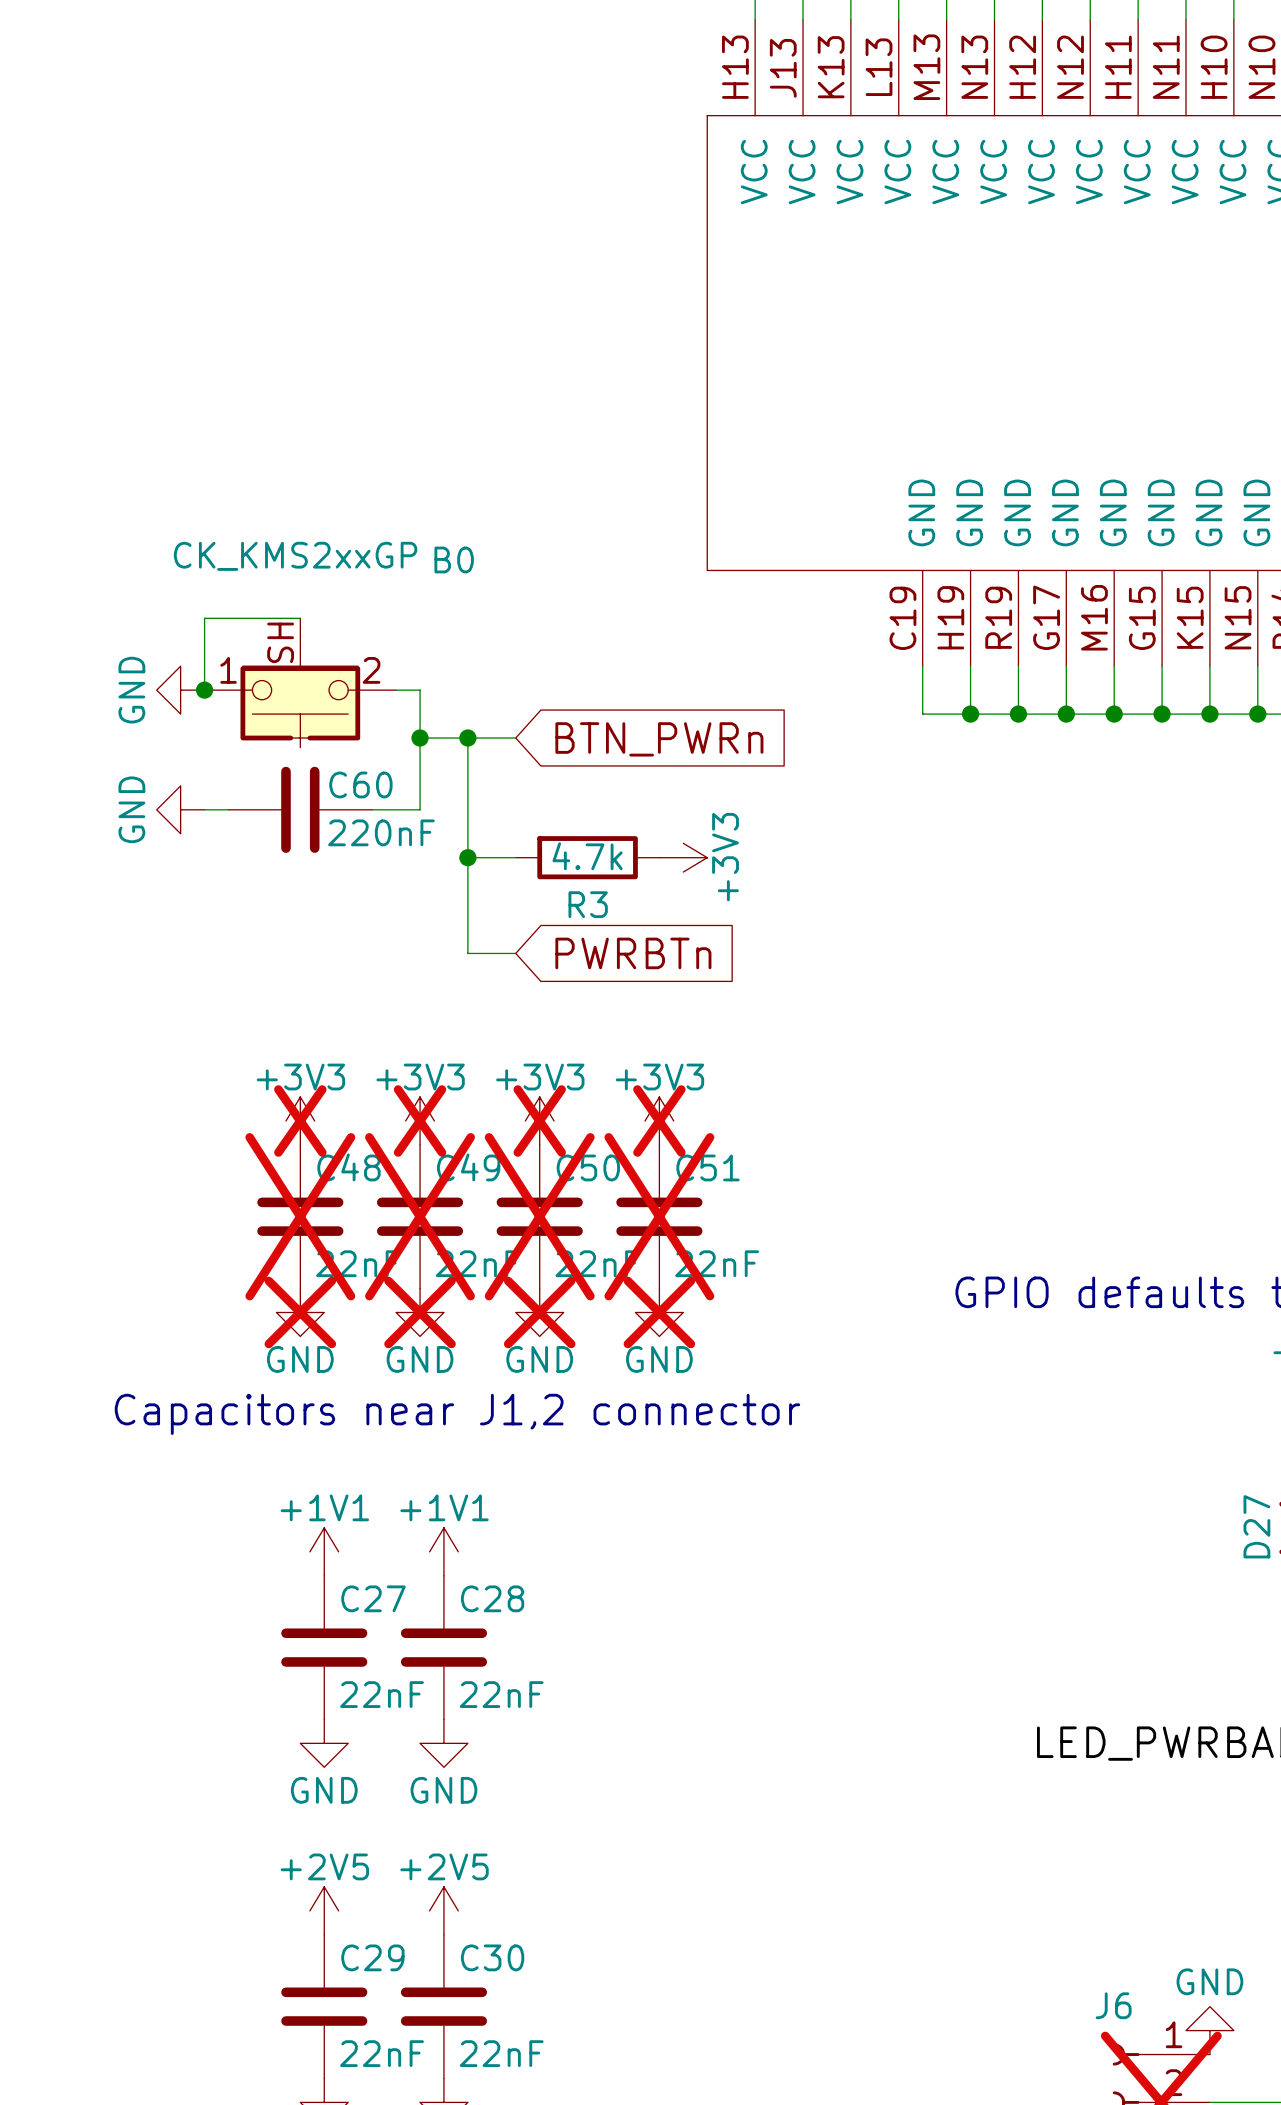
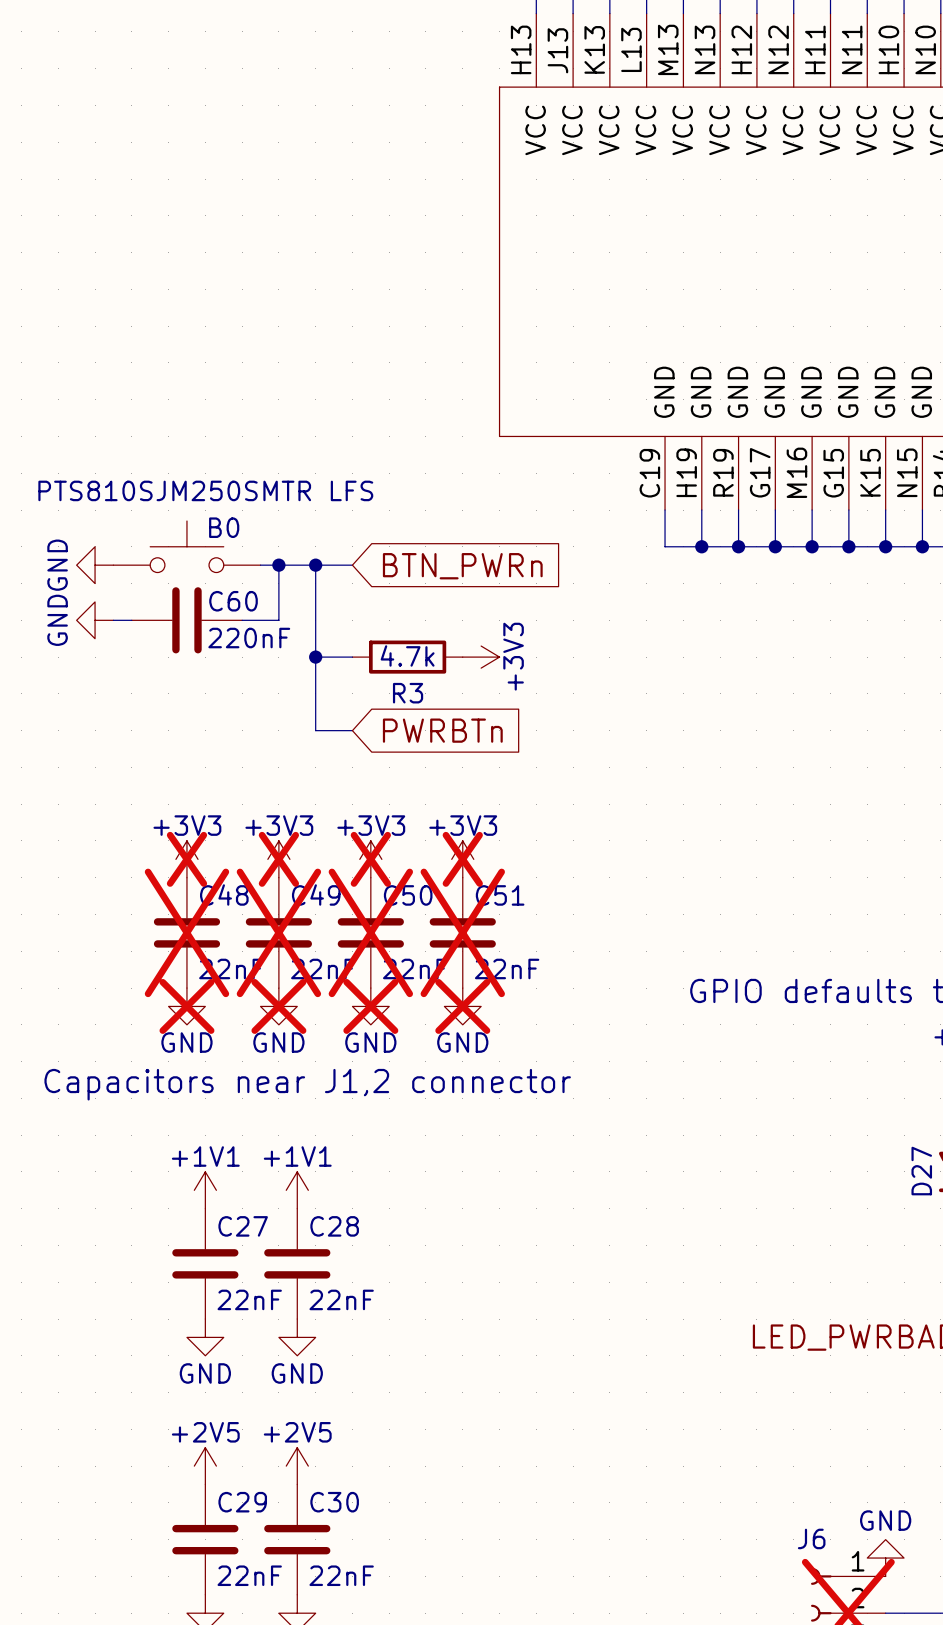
B0 value: CK_KMS2xxGP (295, 556) -> PTS810SJM250SMTR LFS (205, 490)
B0 name position: B0 (454, 559) -> B0 (224, 527)
B0 symbol: [204, 618, 397, 748] -> [113, 521, 261, 573]
wire: (300, 618) (204, 618) (204, 690) -> none
power symbol position: GND (180, 690) -> GND (95, 565)
junction: (204, 690) -> none
wire: (396, 690) (420, 690) (420, 738) -> (260, 565) (278, 565)

